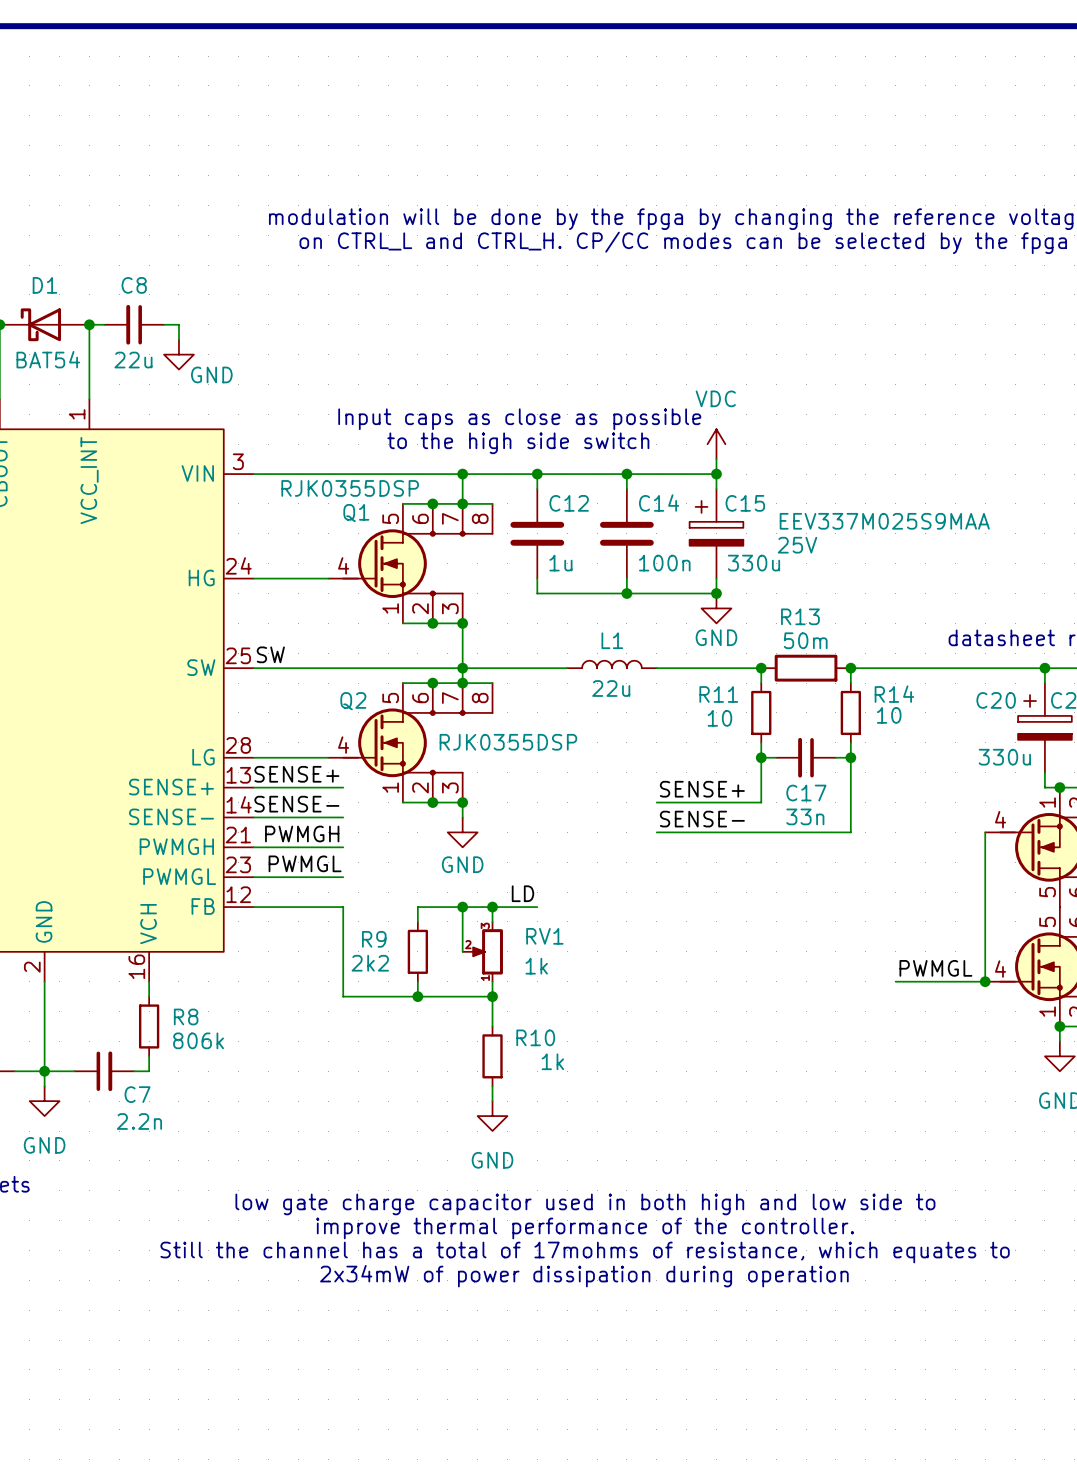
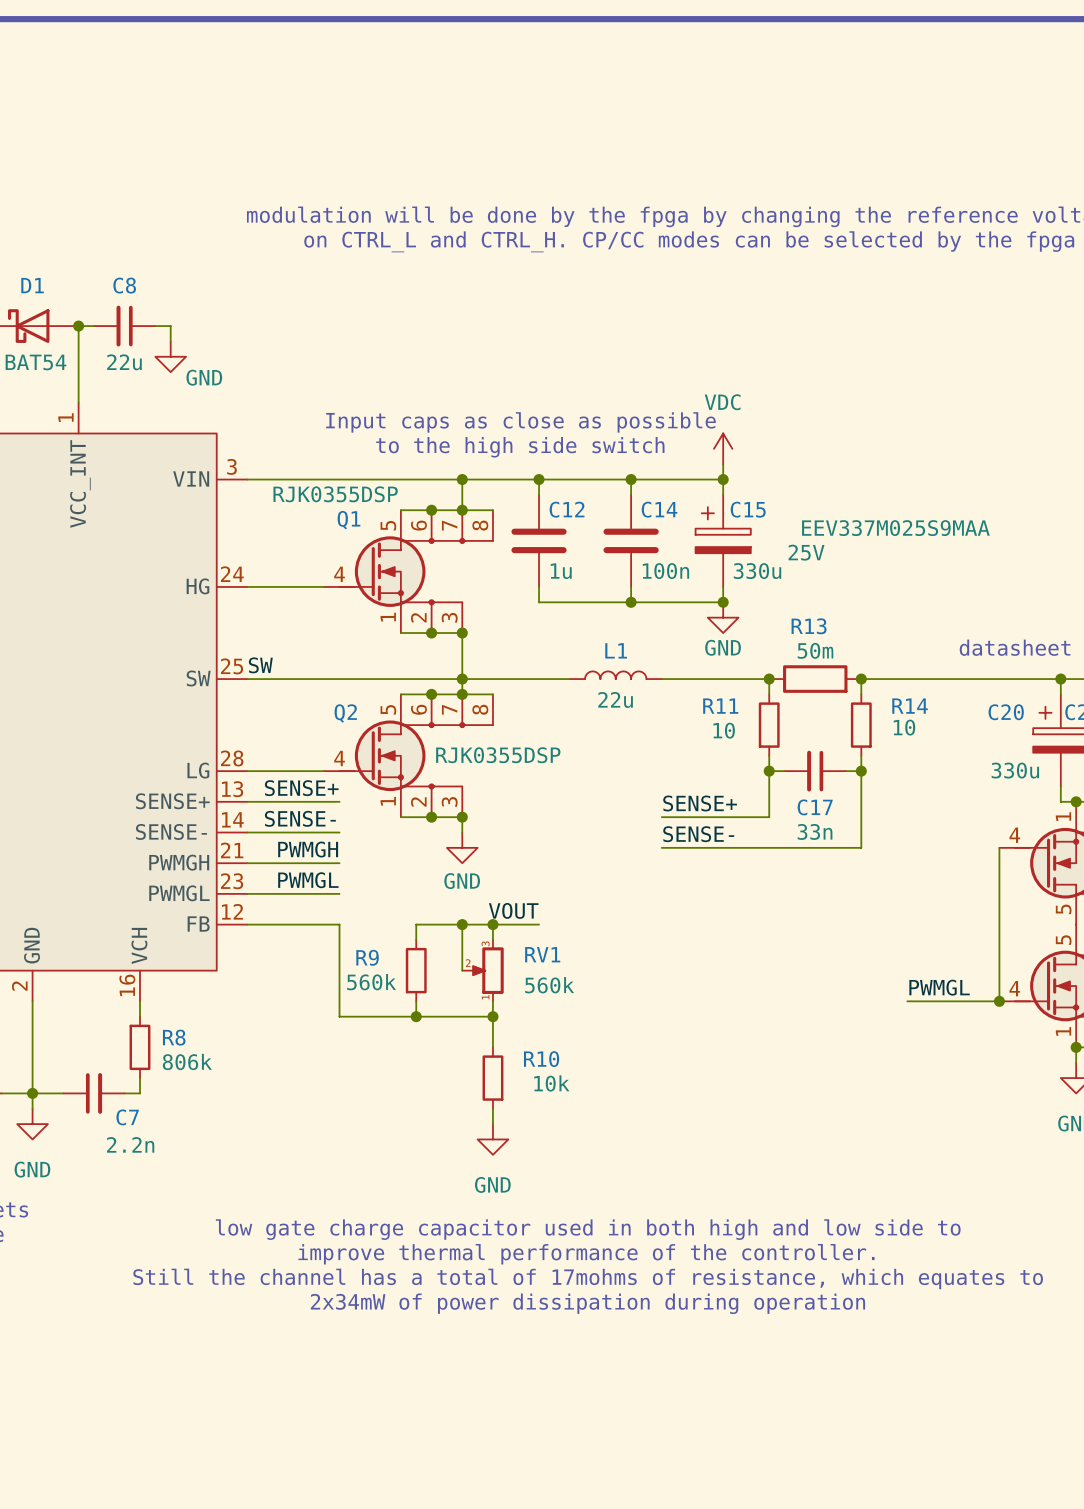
label: LD (522, 893) -> VOUT (513, 910)
R9 value: 2k2 (370, 963) -> 560k (371, 982)
RV1 value: 1k (536, 966) -> 560k (549, 985)
R10 value: 1k (552, 1061) -> 10k (551, 1083)

